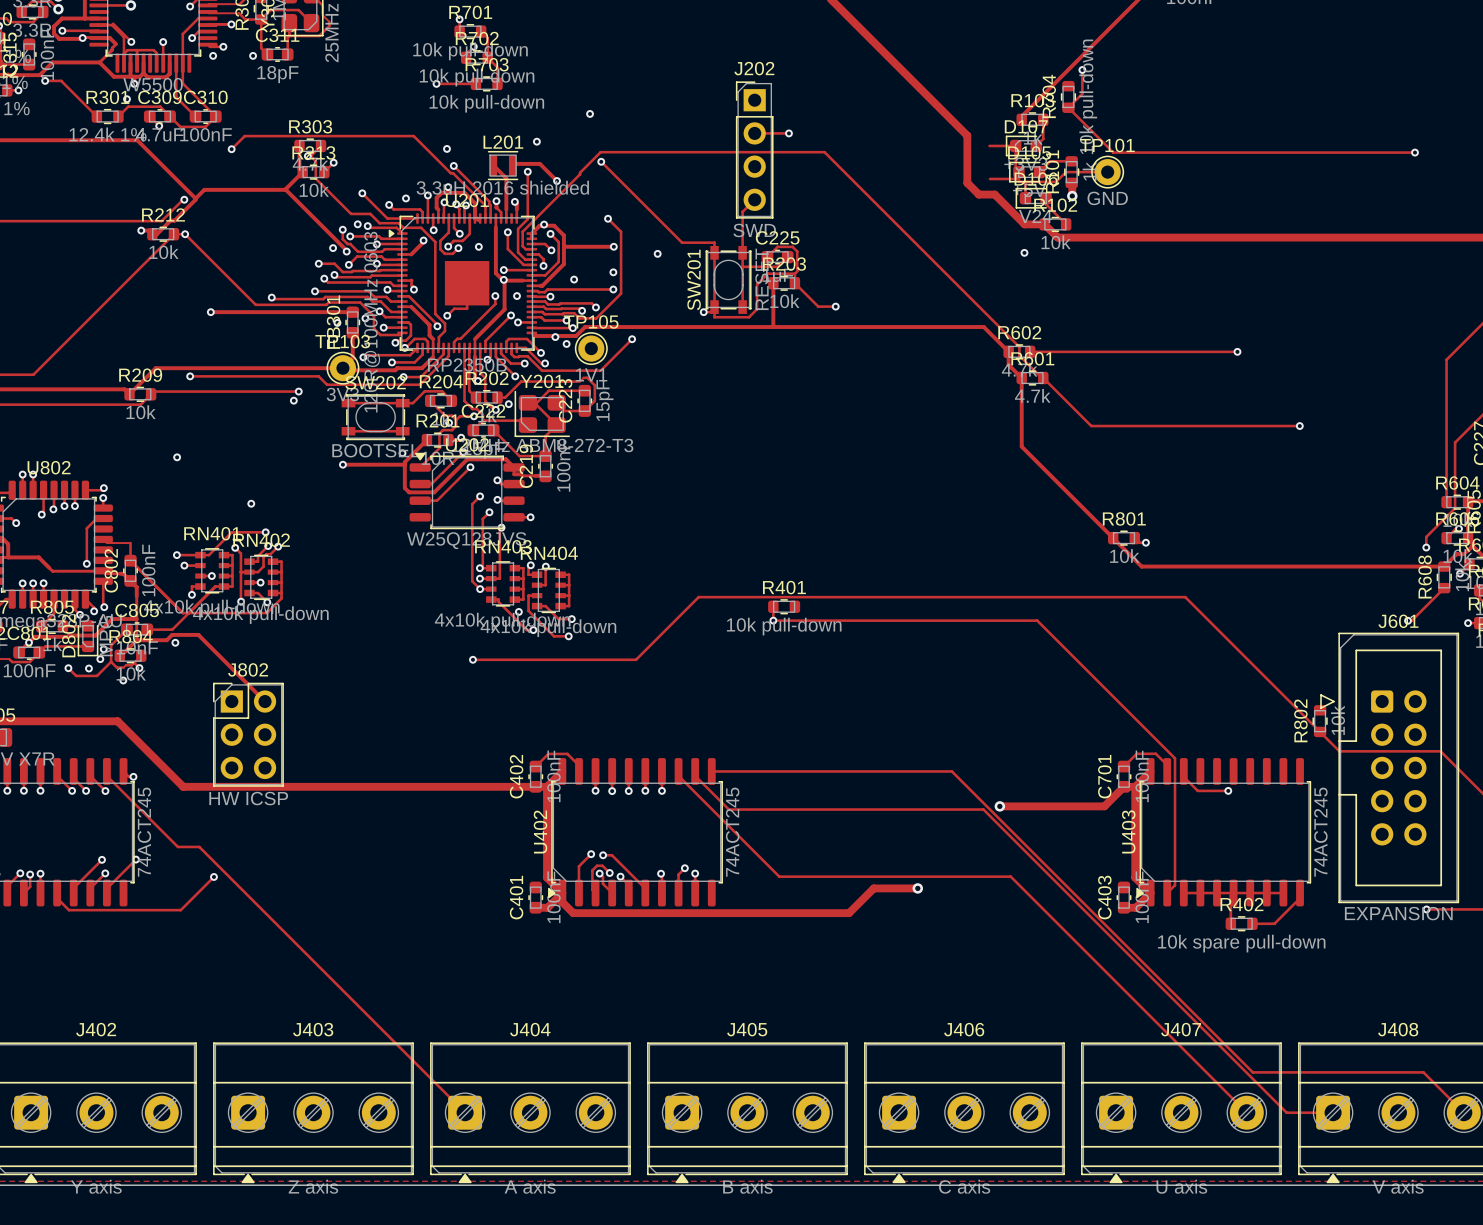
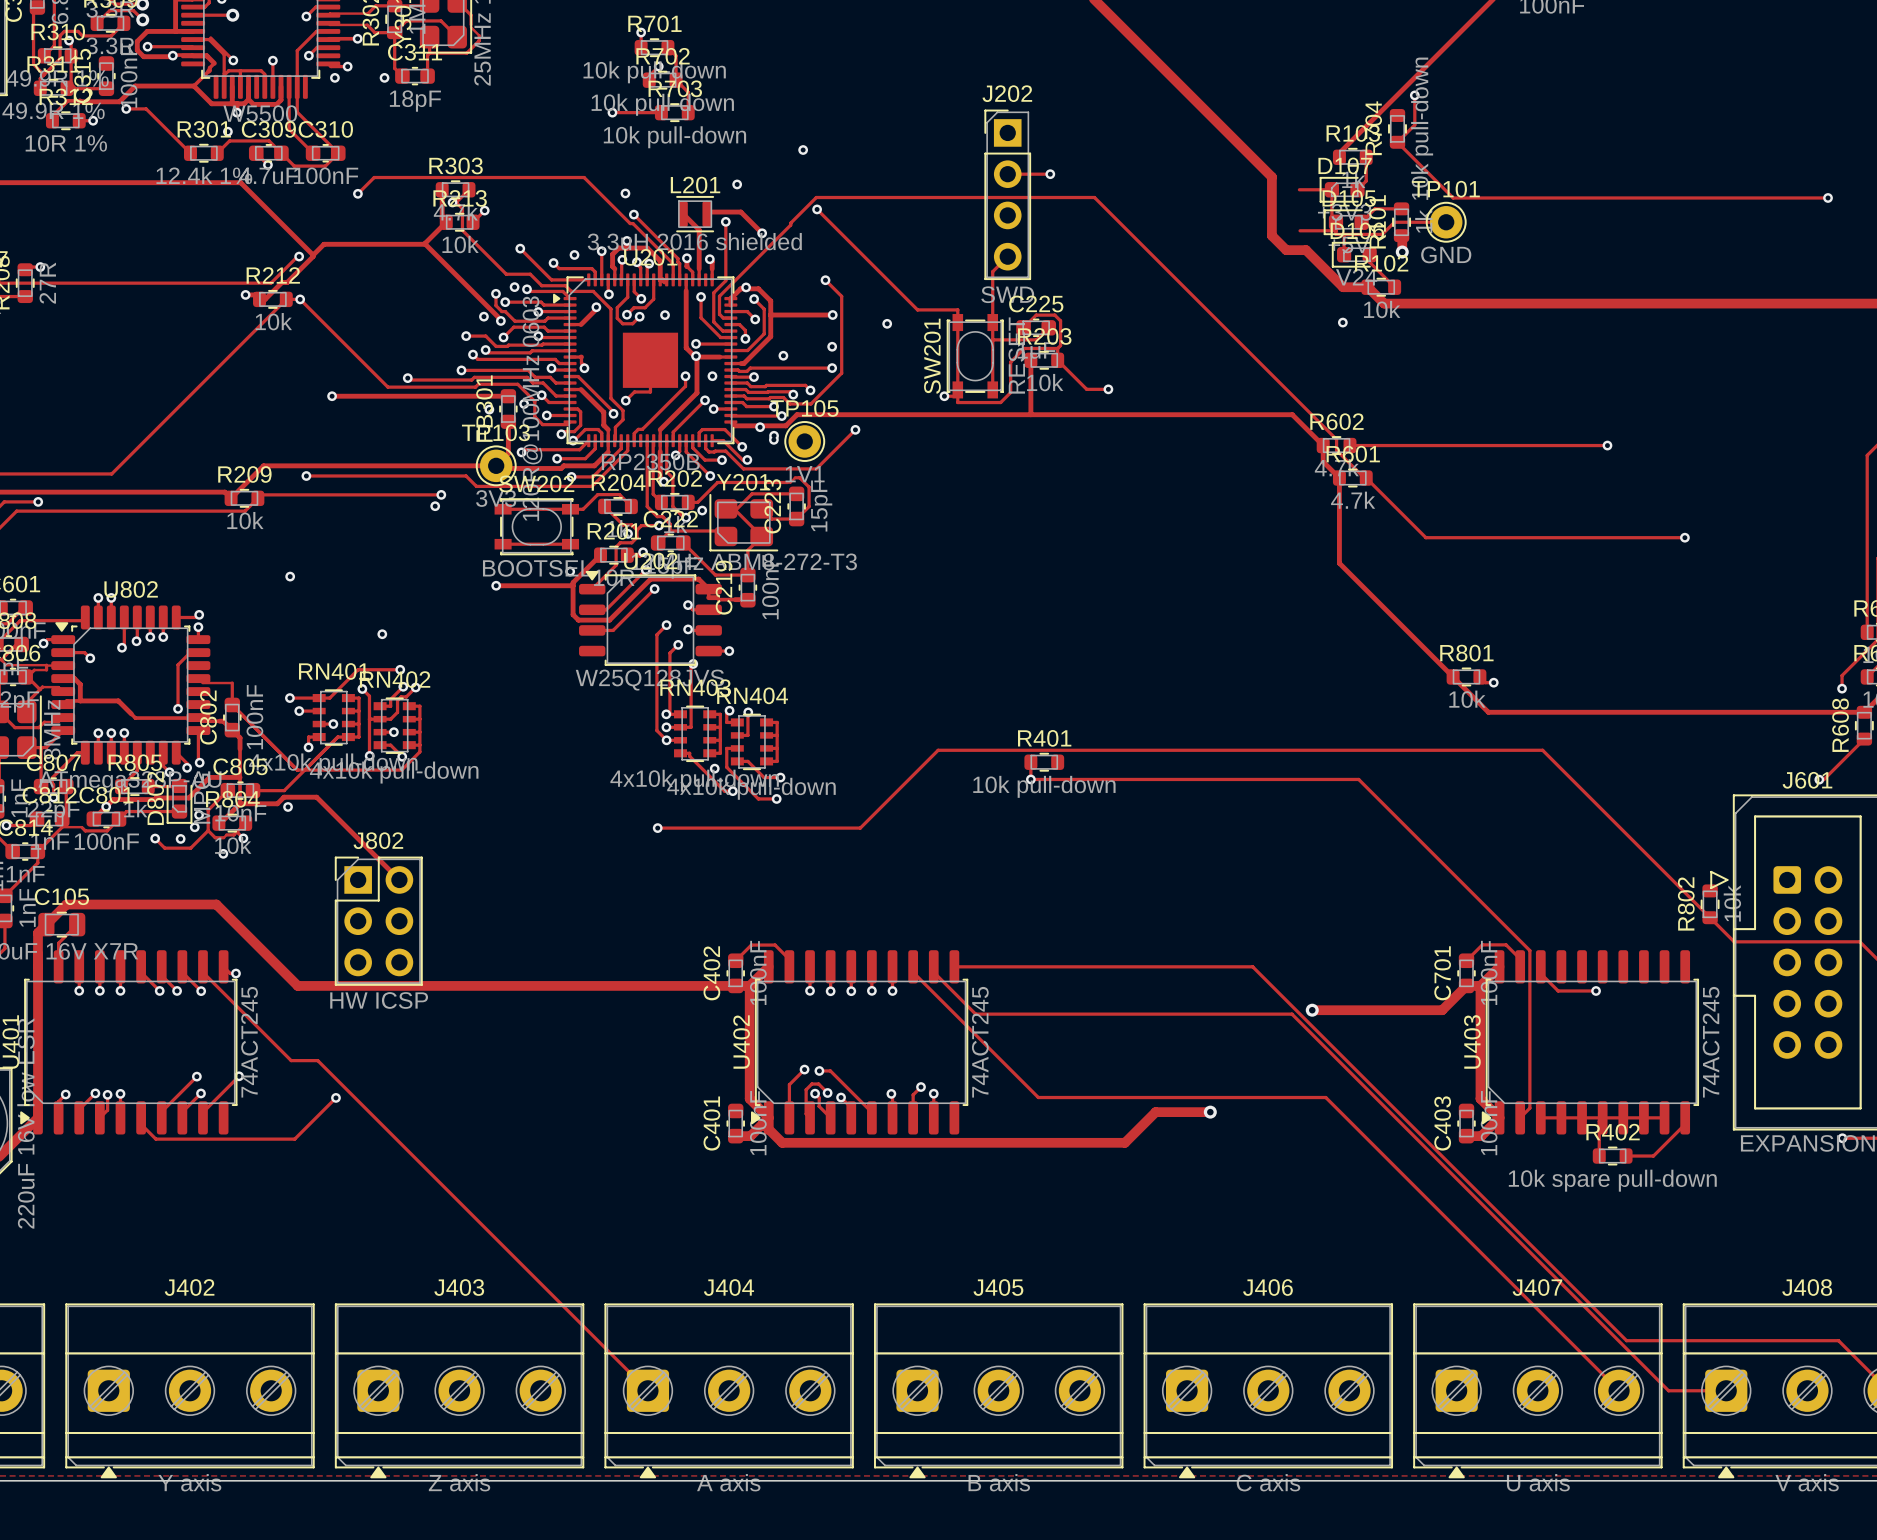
via: none -> (773, 439)

